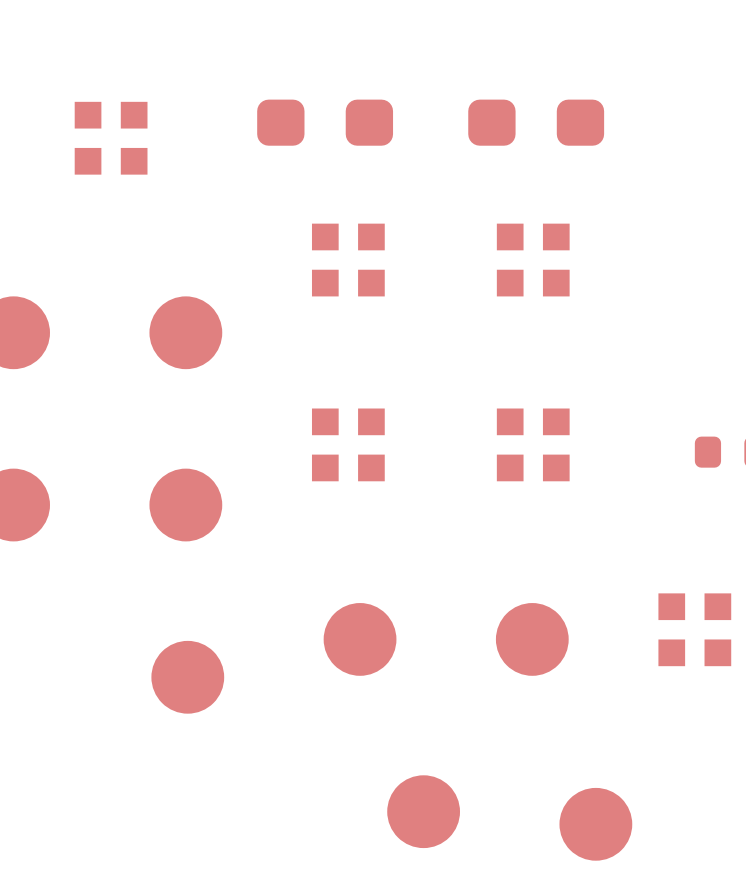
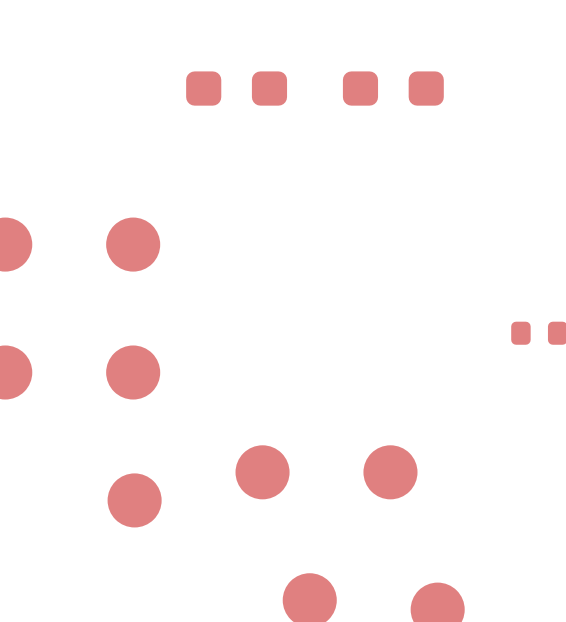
part: (111, 138) -> none
part: (348, 260) -> none
part: (533, 260) -> none
part: (348, 444) -> none
part: (533, 444) -> none
part: (694, 629) -> none

